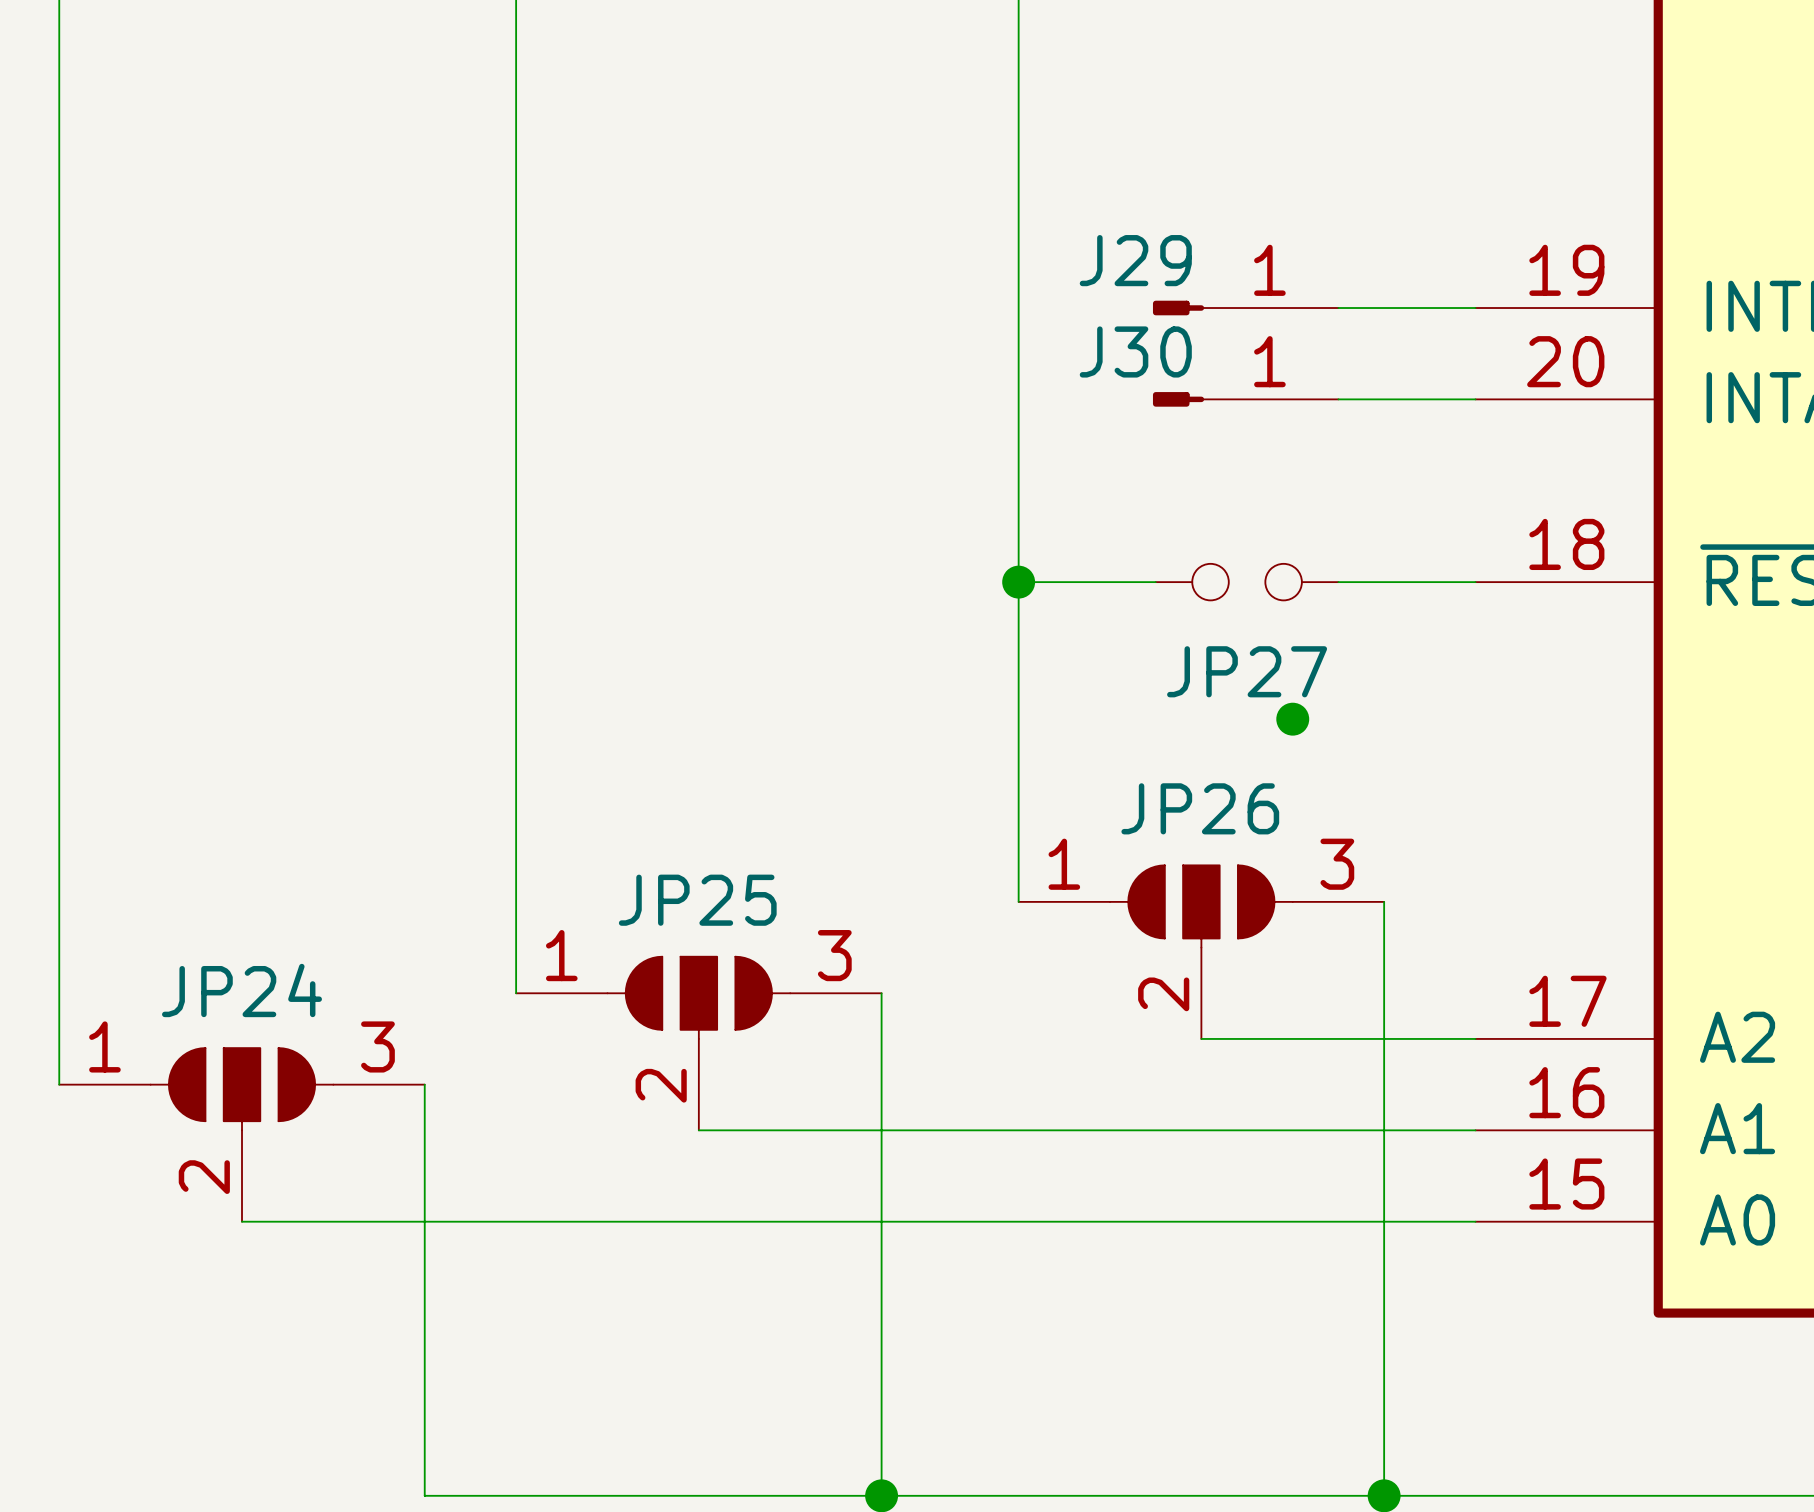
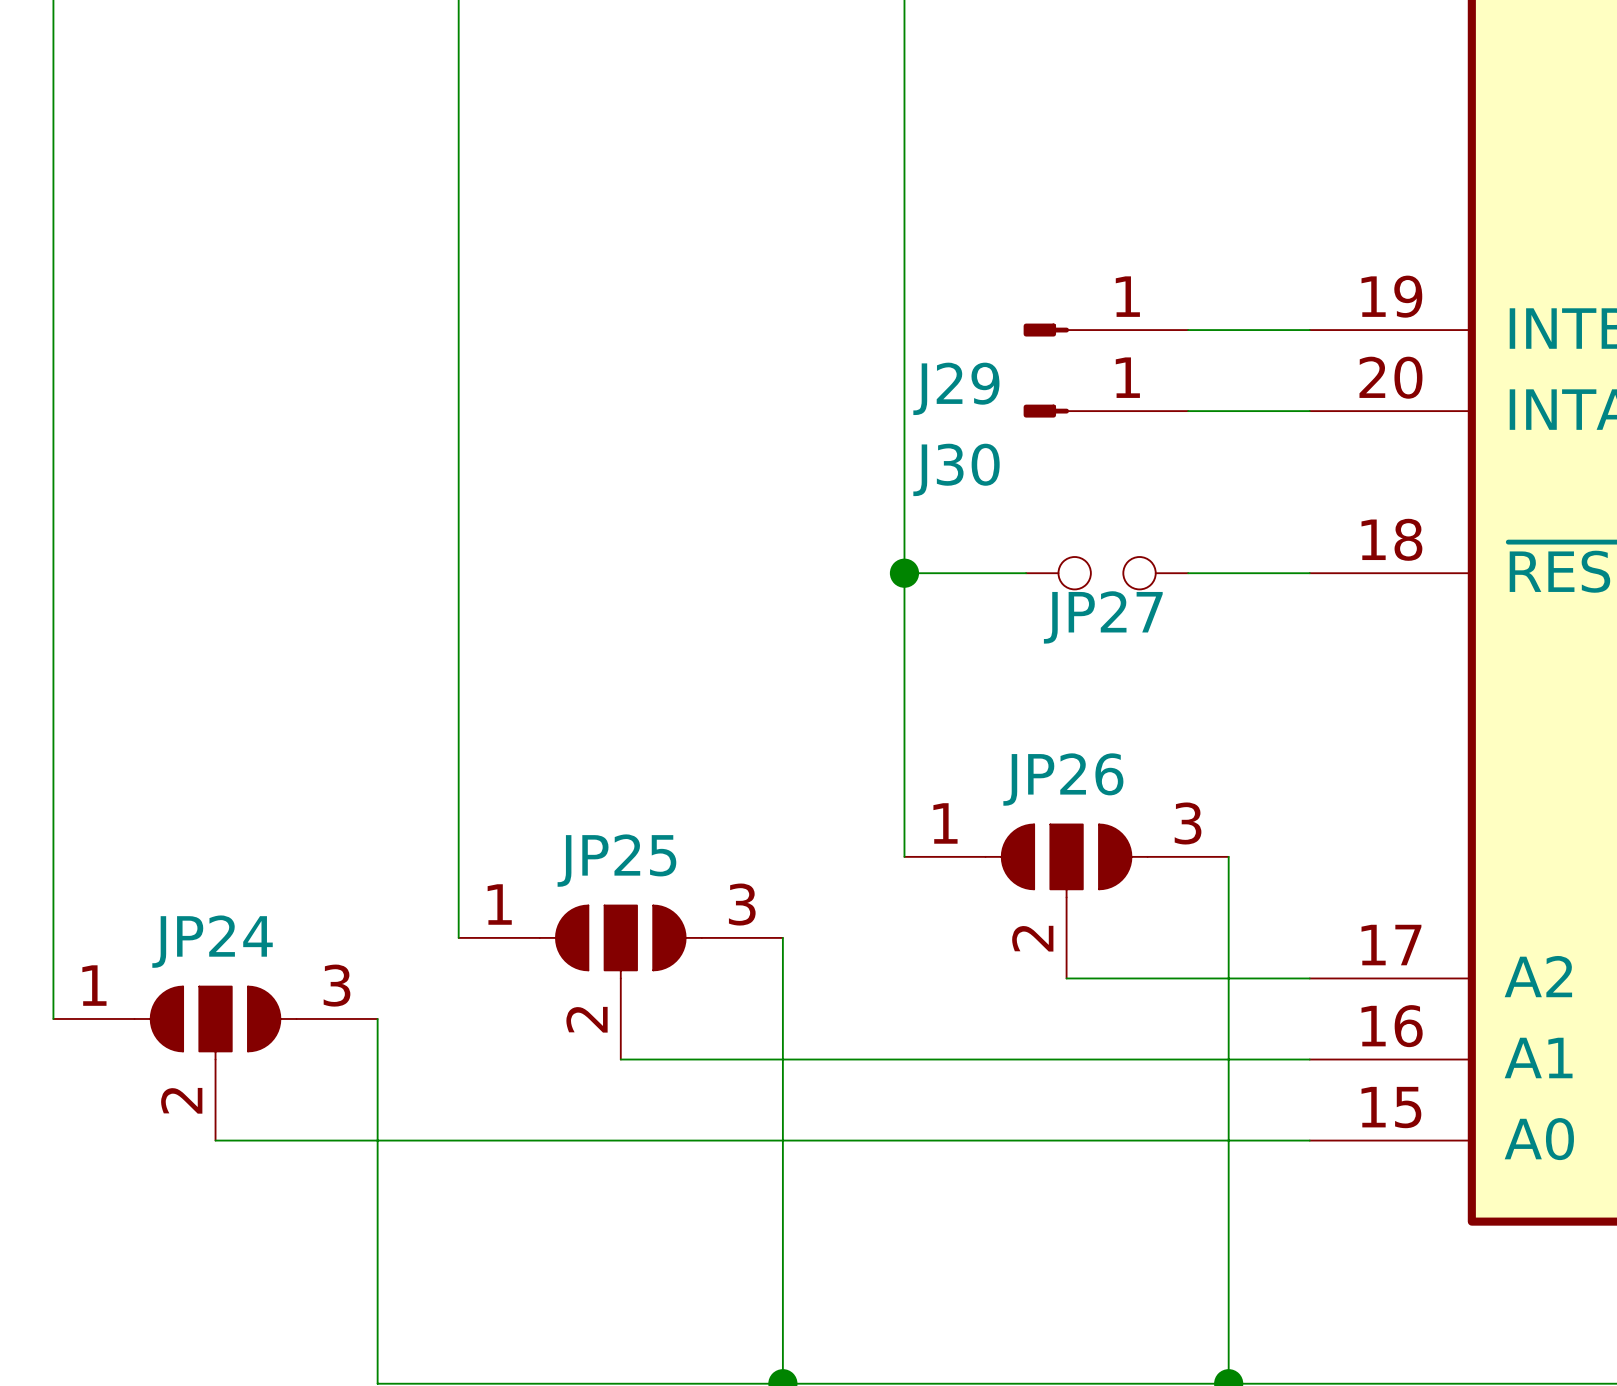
J29 name position: J29 (1135, 260) -> J29 (956, 388)
J30 name position: J30 (1135, 351) -> J30 (956, 469)
JP27 name position: JP27 (1247, 671) -> JP27 (1103, 617)
junction: (1292, 719) -> none

